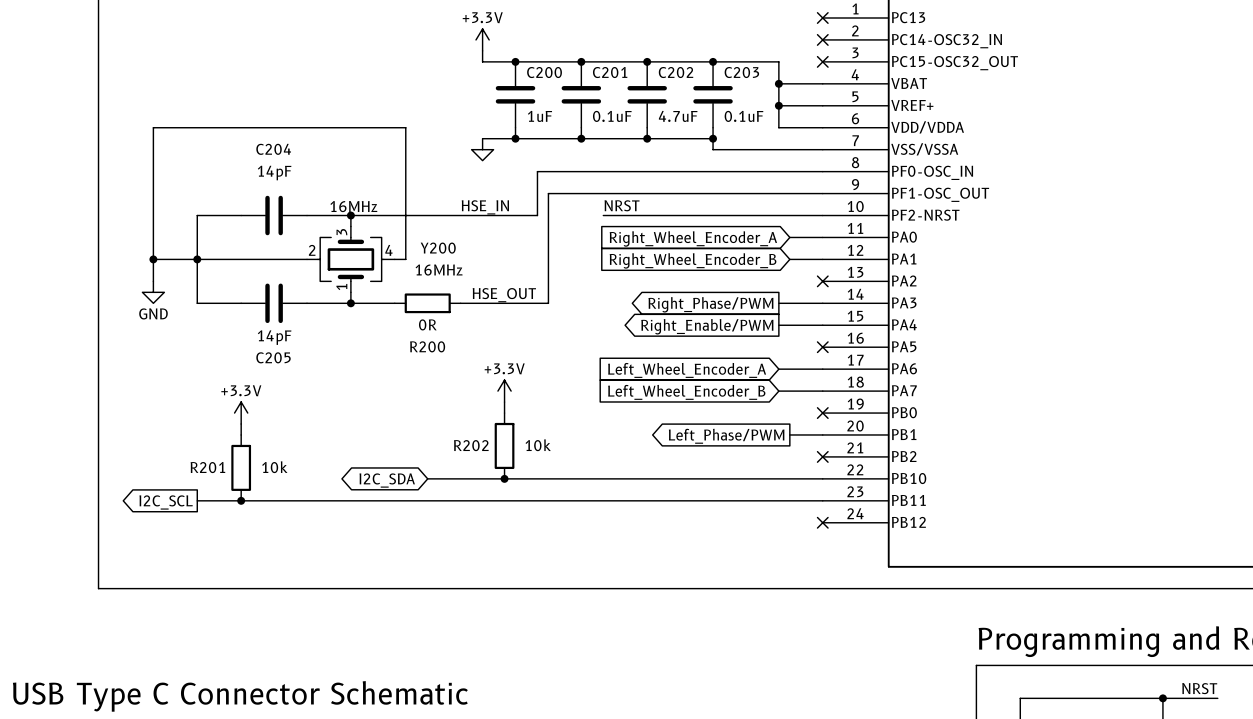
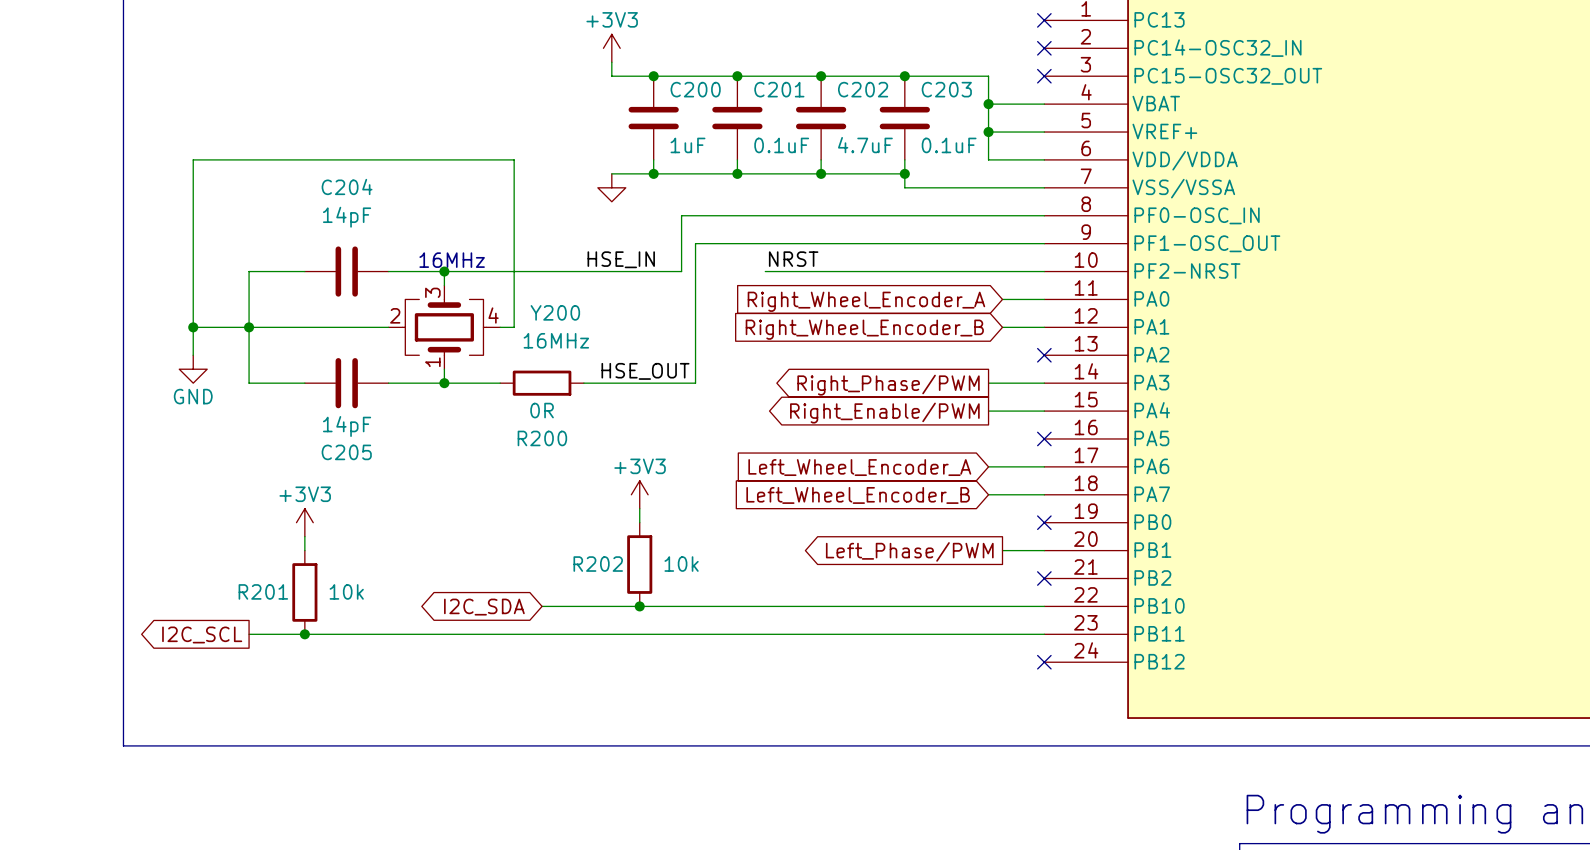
power symbol: +3.3V (482, 39) -> +3V3 (611, 48)
power symbol: +3.3V (504, 391) -> +3V3 (639, 494)
power symbol: +3.3V (241, 413) -> +3V3 (304, 522)

